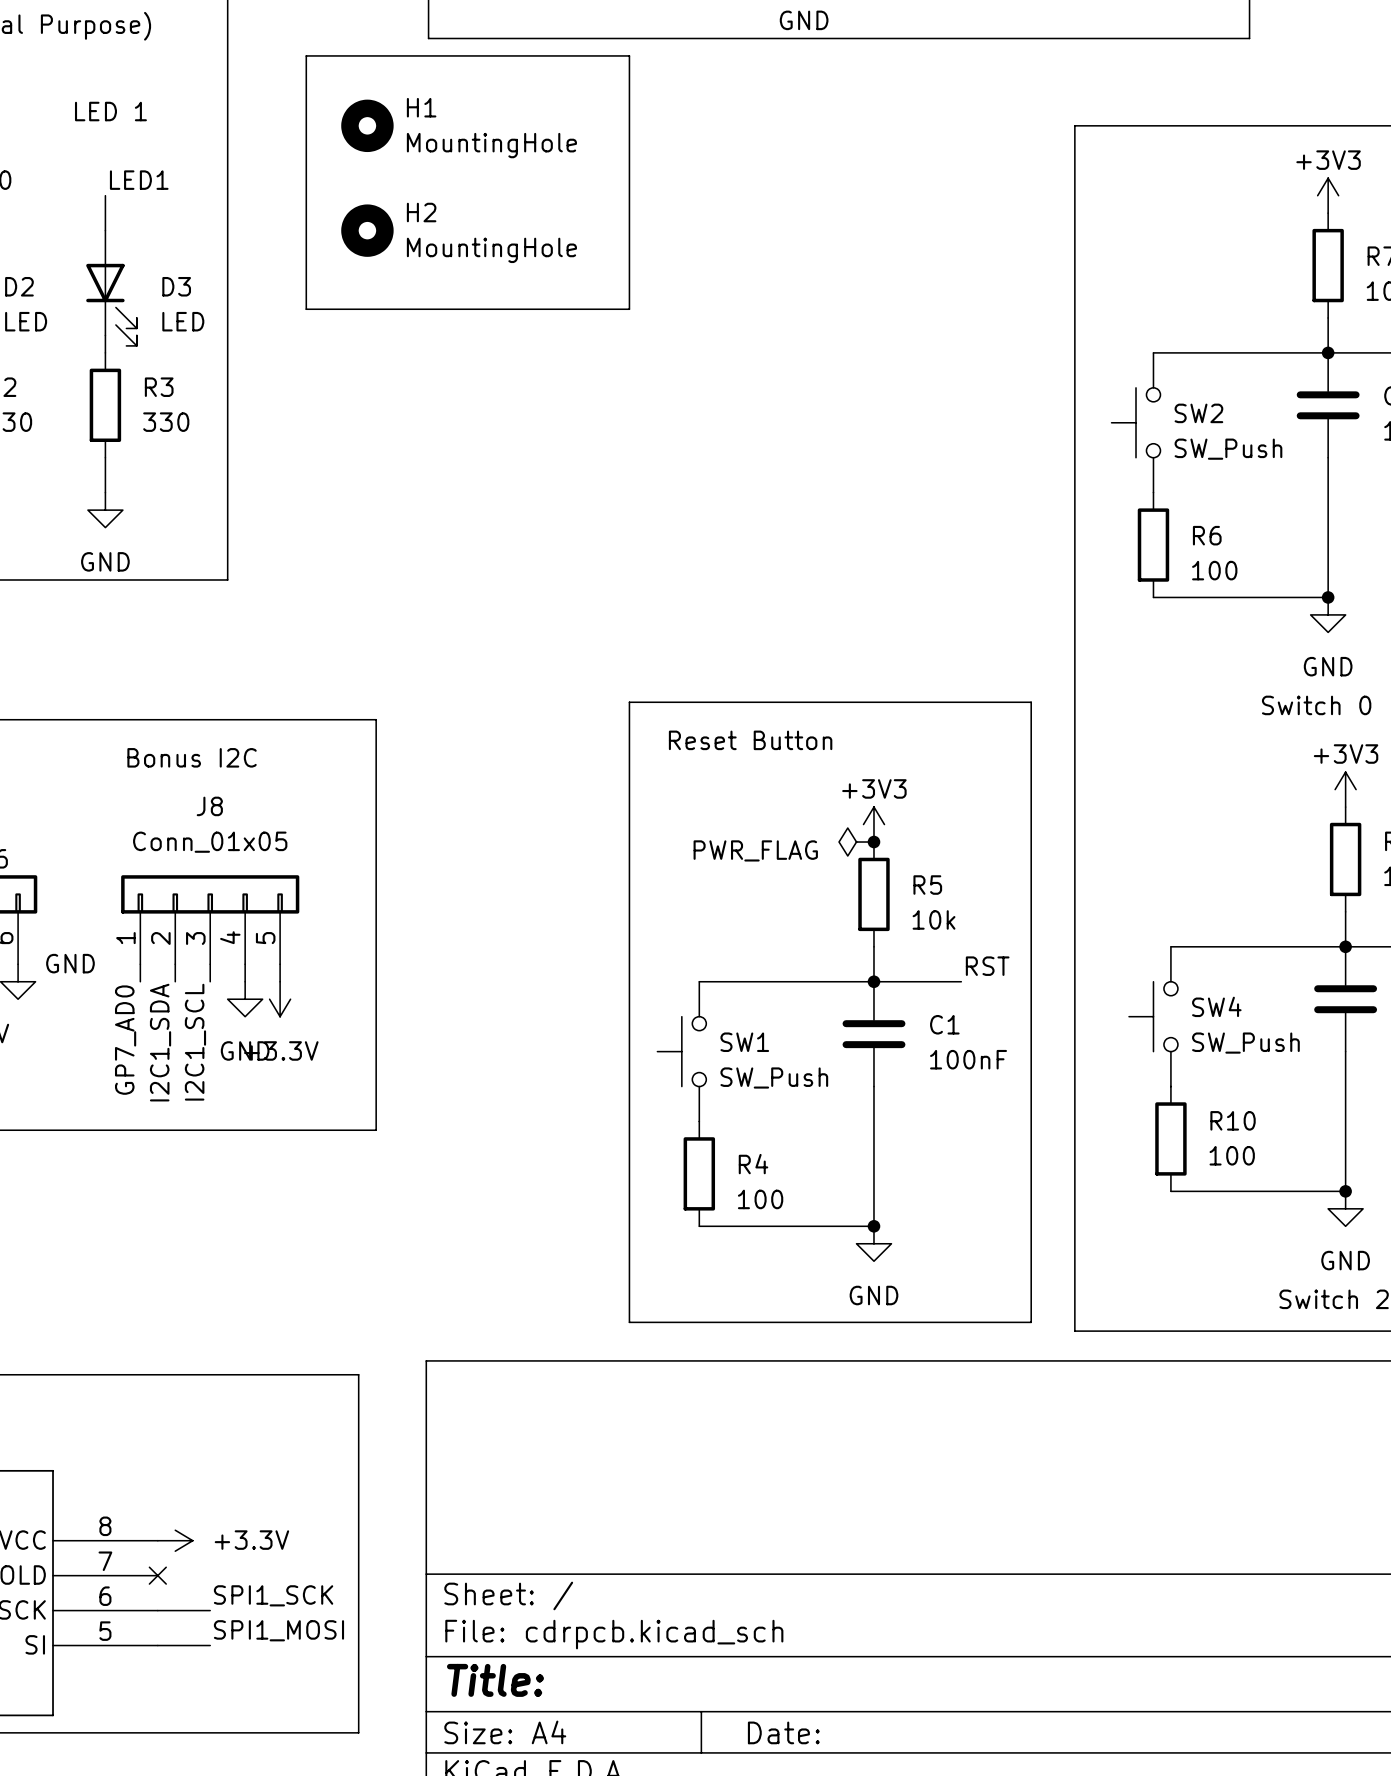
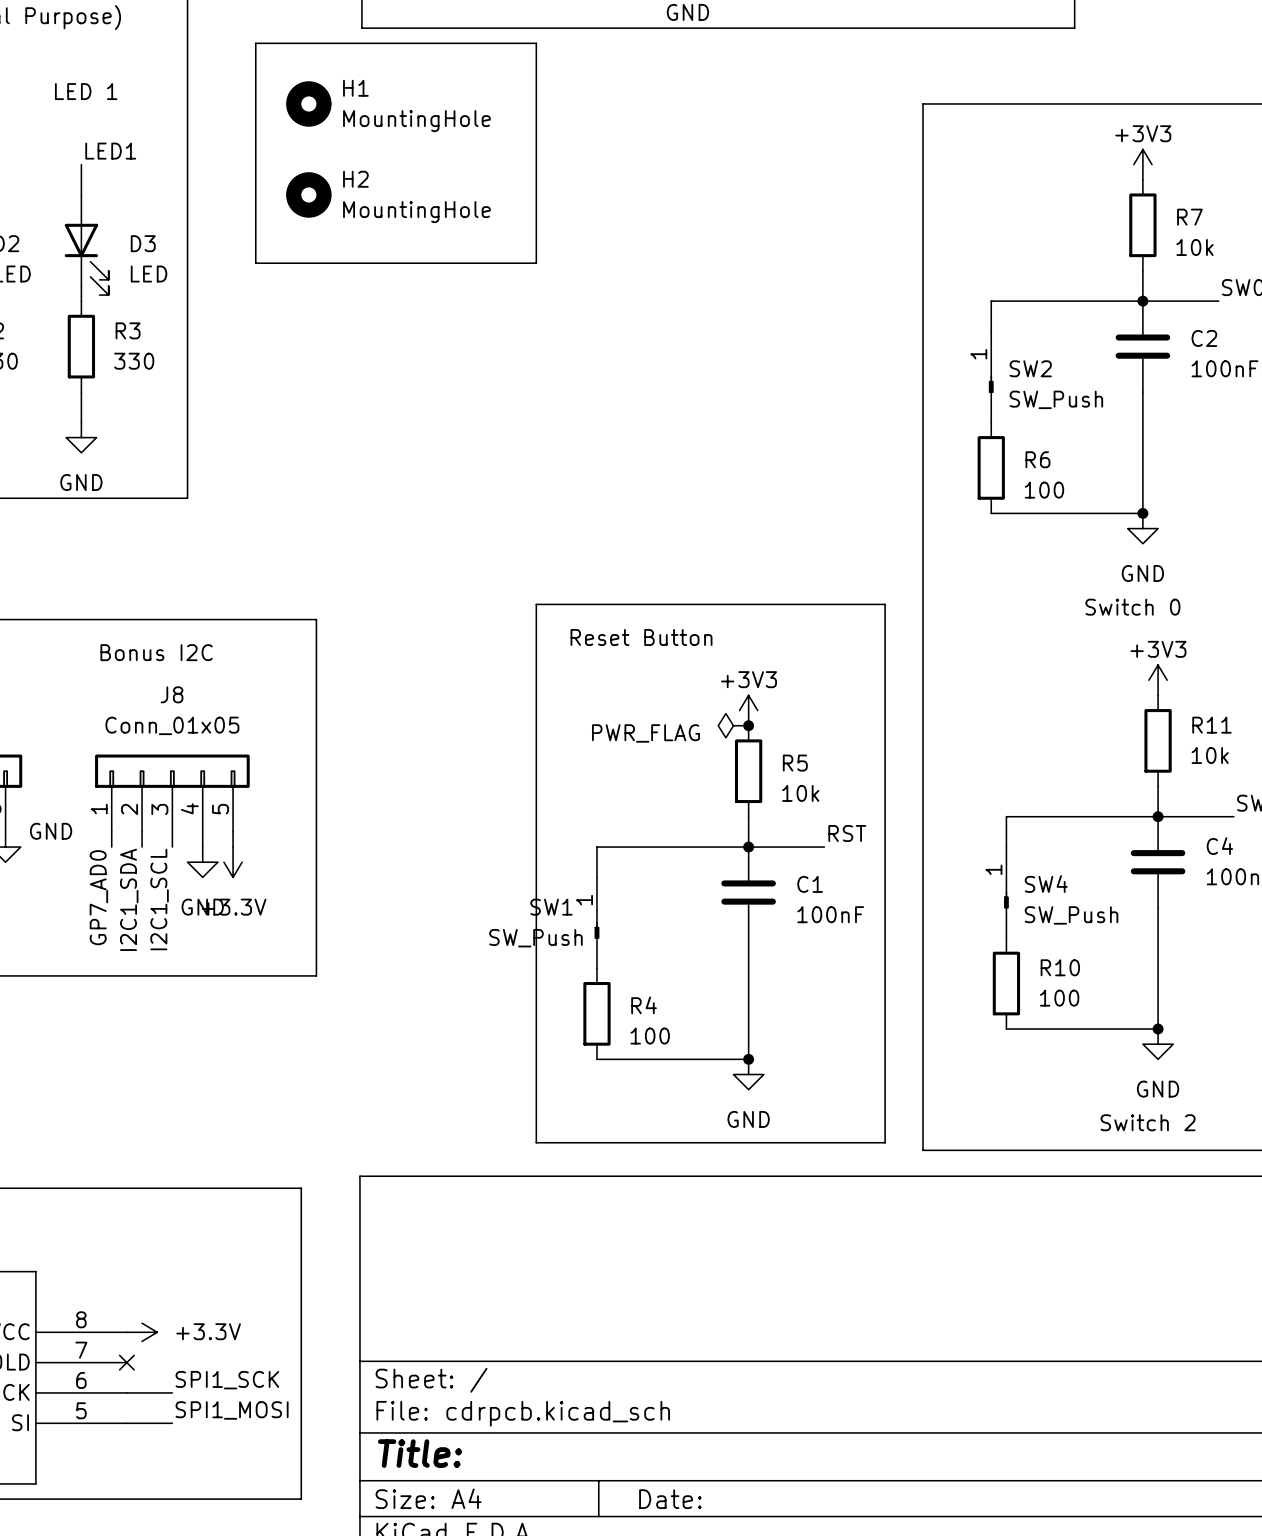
SW2 symbol: [1111, 352, 1161, 493] -> [988, 331, 994, 394]
SW4 symbol: [1129, 946, 1178, 1087] -> [1004, 847, 1009, 909]
SW1 symbol: [657, 981, 707, 1122] -> [594, 877, 600, 939]
SW1 name position: SW1 (744, 1042) -> SW1 (551, 907)
SW1 value position: SW_Push (774, 1078) -> SW_Push (535, 938)

